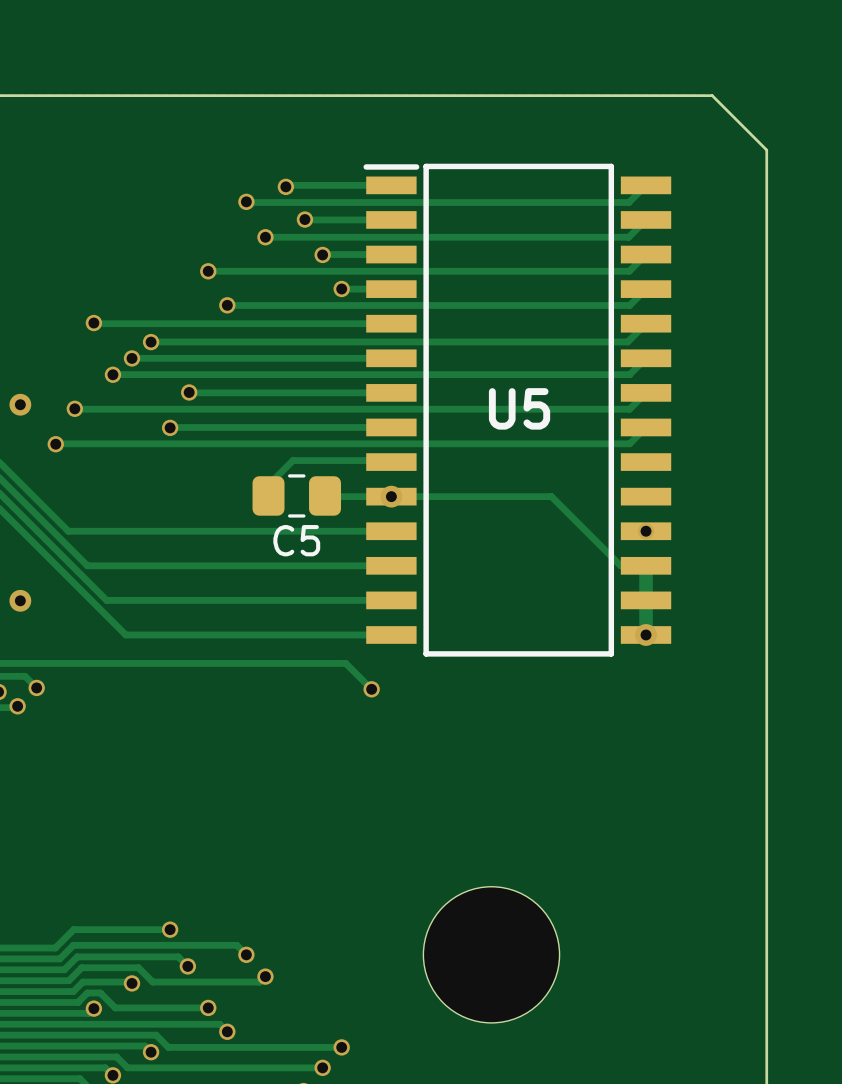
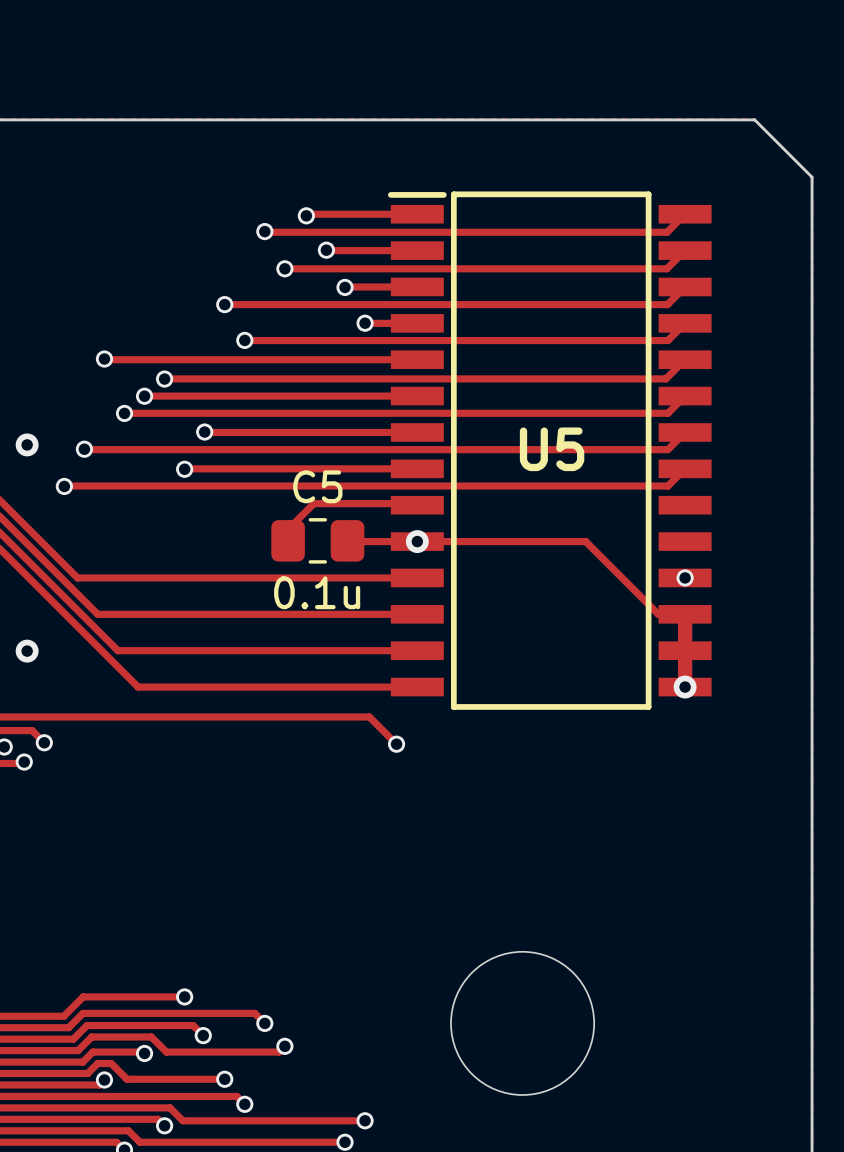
C5 name position: C5 (296, 540) -> C5 (317, 486)
C5 value: none -> 0.1u (317, 592)

